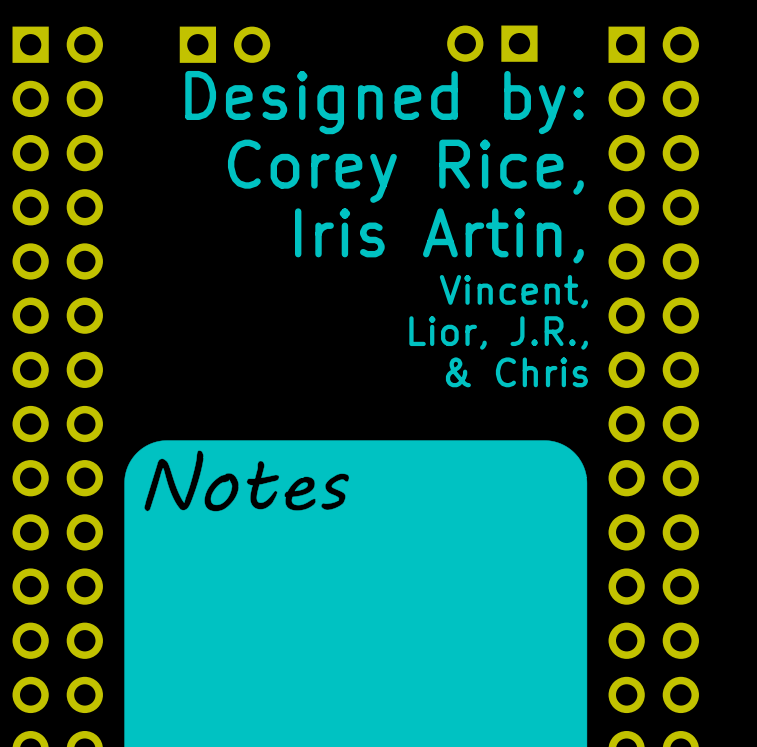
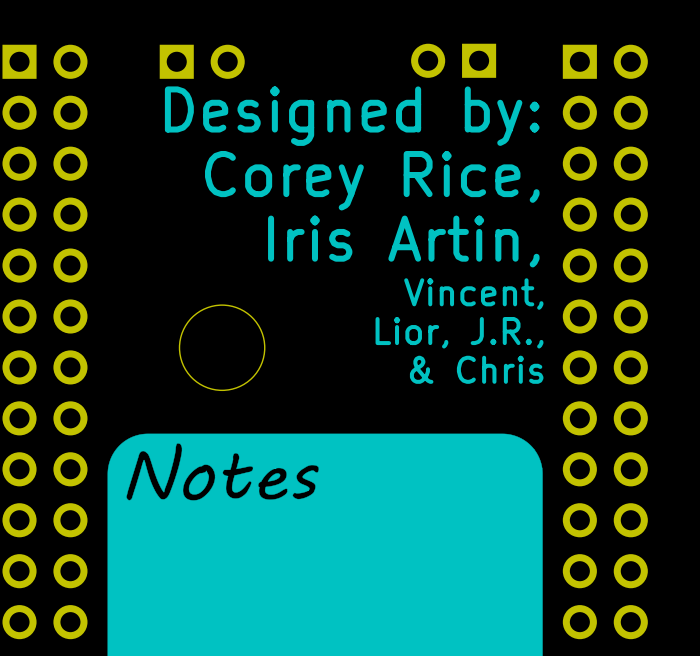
round board edge: none -> [179, 304, 266, 391]

